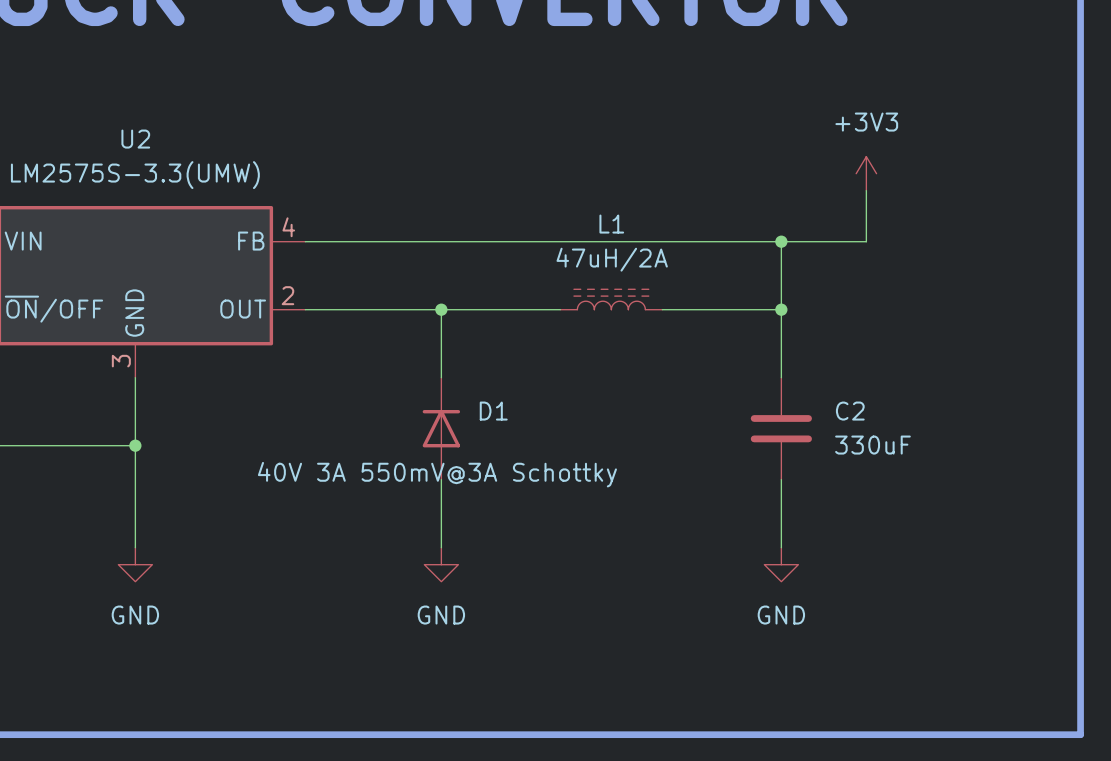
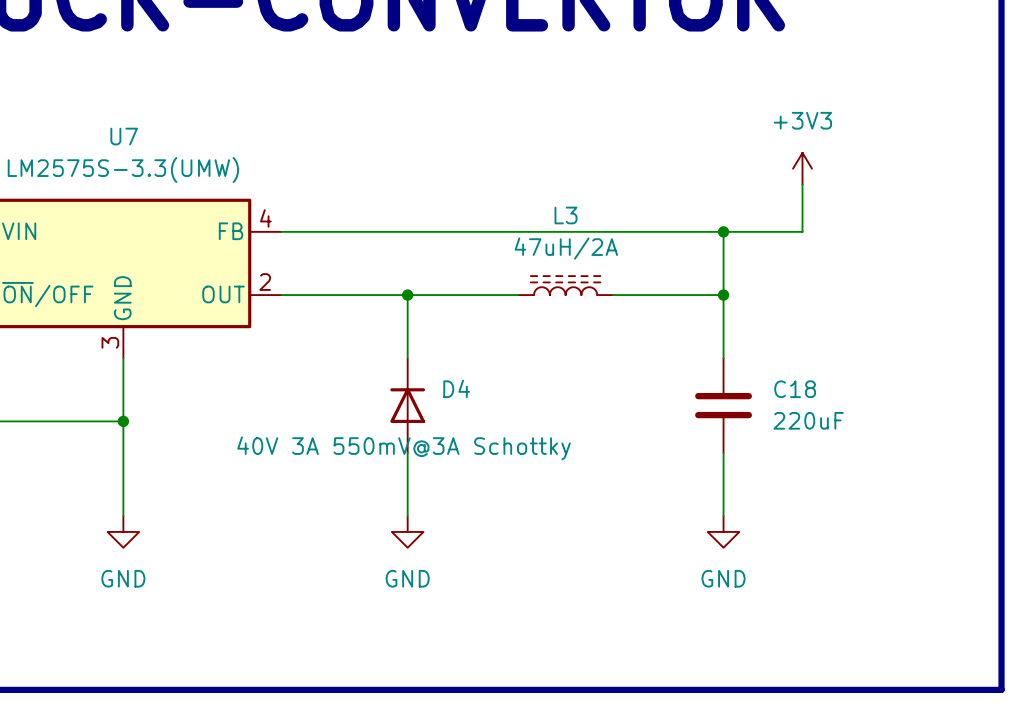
U2 name: U2 (135, 139) -> U7 (124, 136)
L1 name: L1 (611, 224) -> L3 (565, 215)
D1 name: D1 (493, 411) -> D4 (456, 388)
C2 name: C2 (850, 411) -> C18 (795, 389)
C2 value: 330uF (872, 445) -> 220uF (808, 420)

